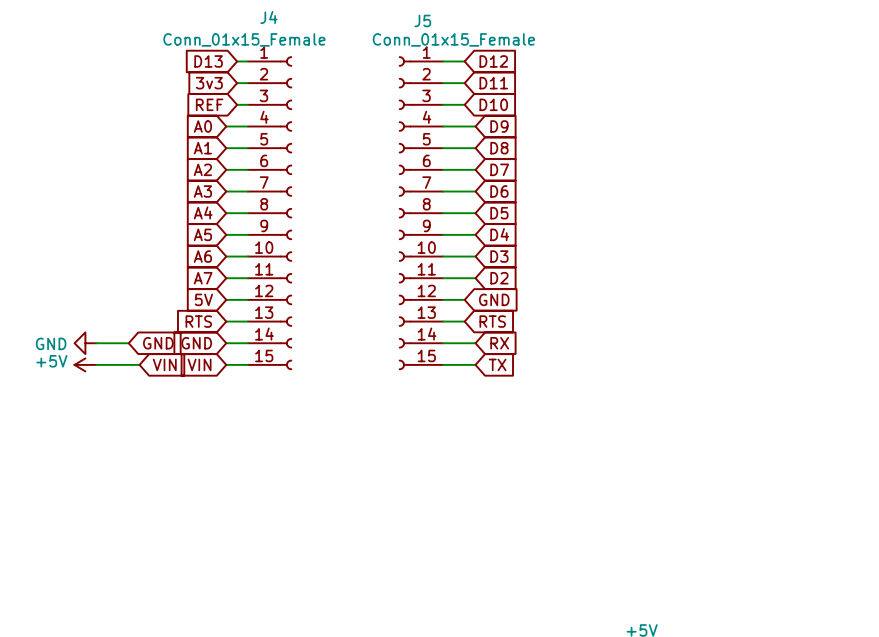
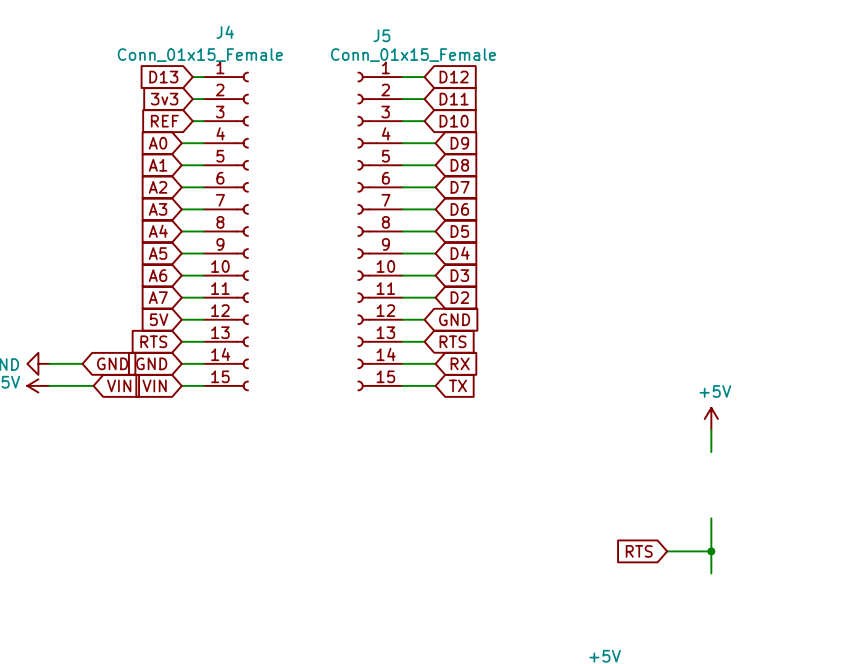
power symbol: none -> +5V (711, 419)
wire: none -> (711, 430) (711, 452)
wire: none -> (711, 518) (711, 573)
global label: none -> RTS (639, 551)
wire: none -> (667, 551) (711, 551)
junction: none -> (711, 551)

